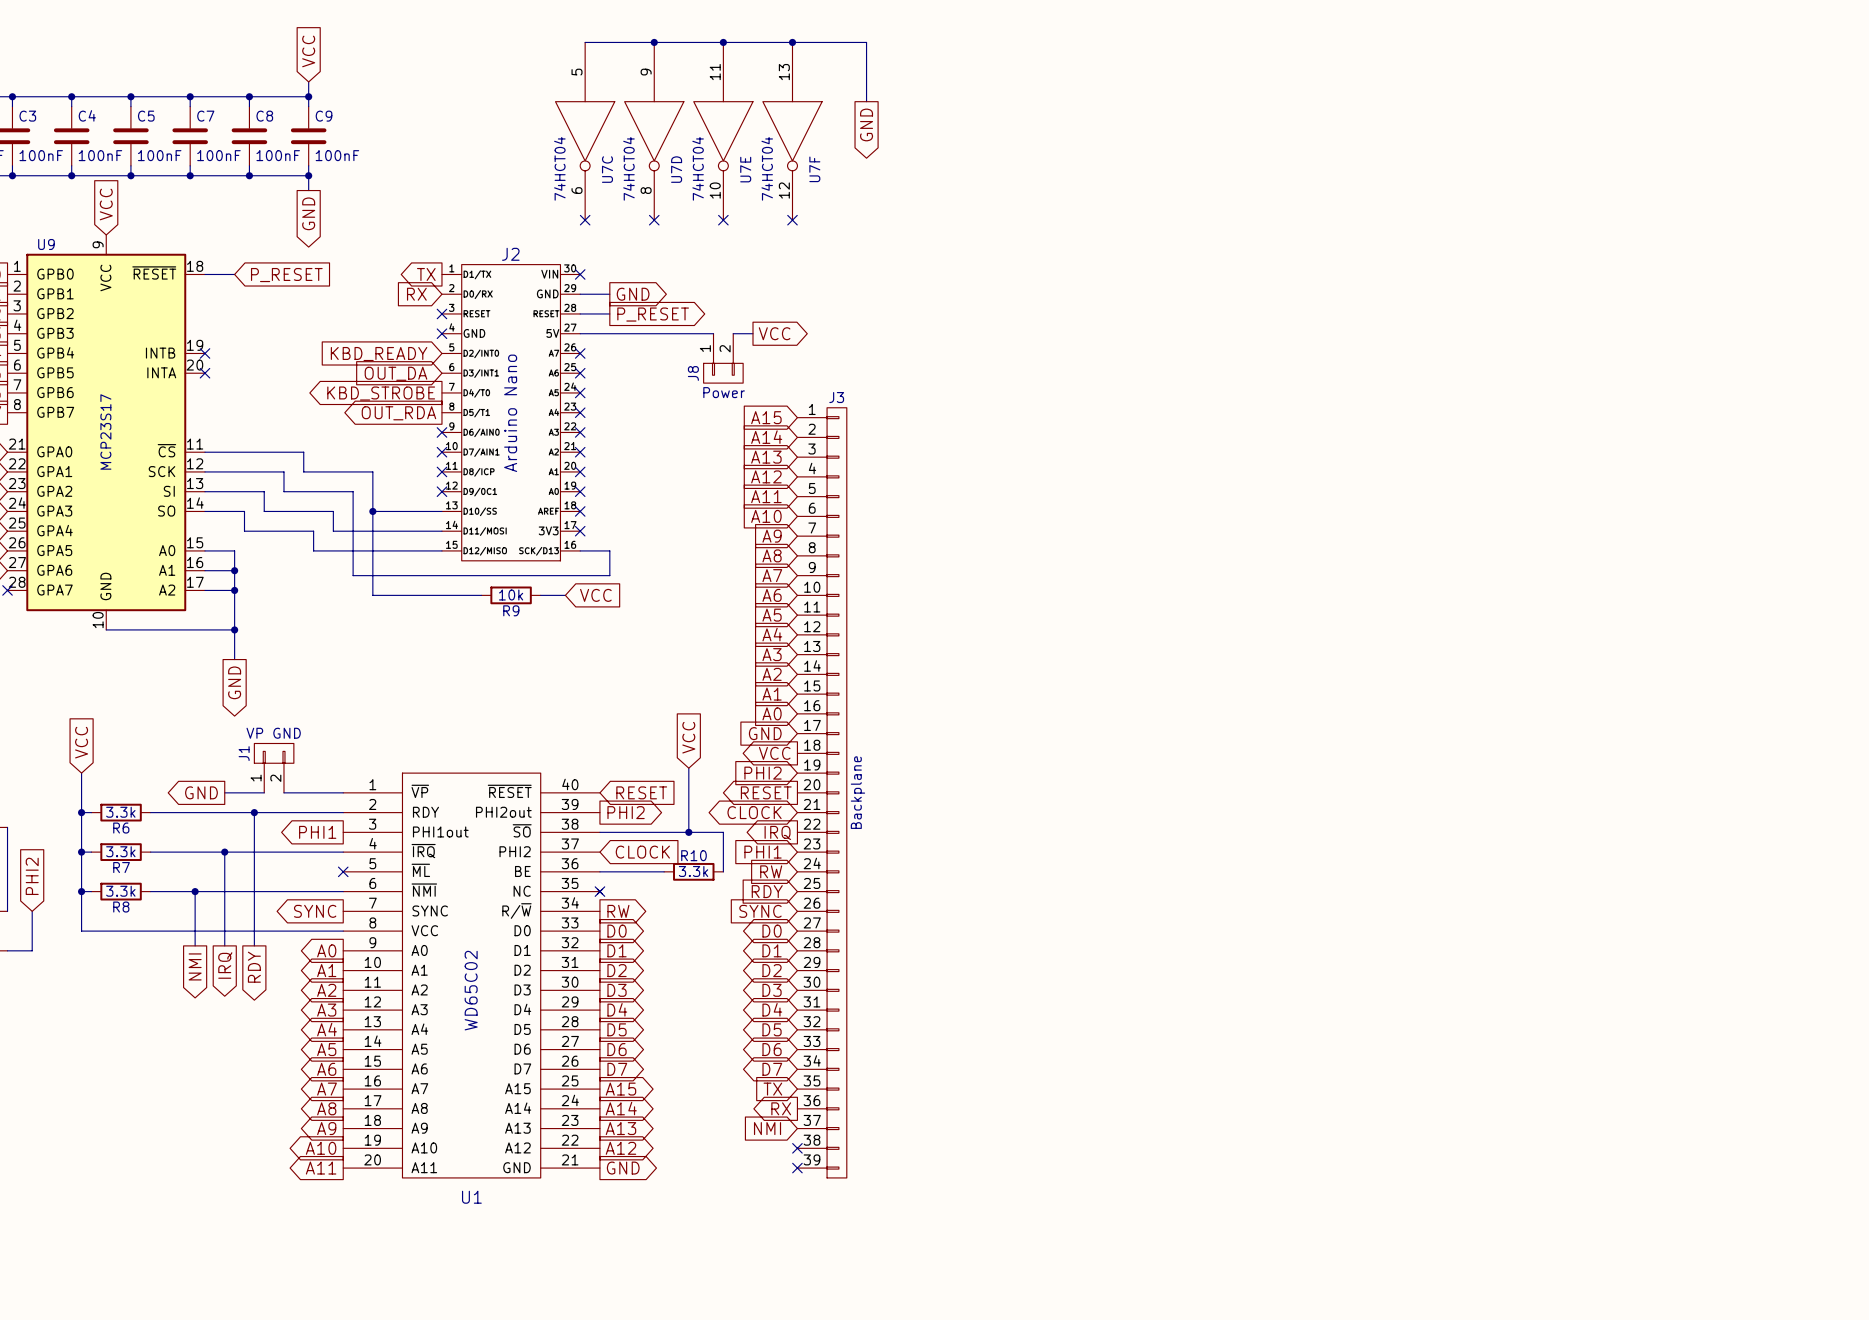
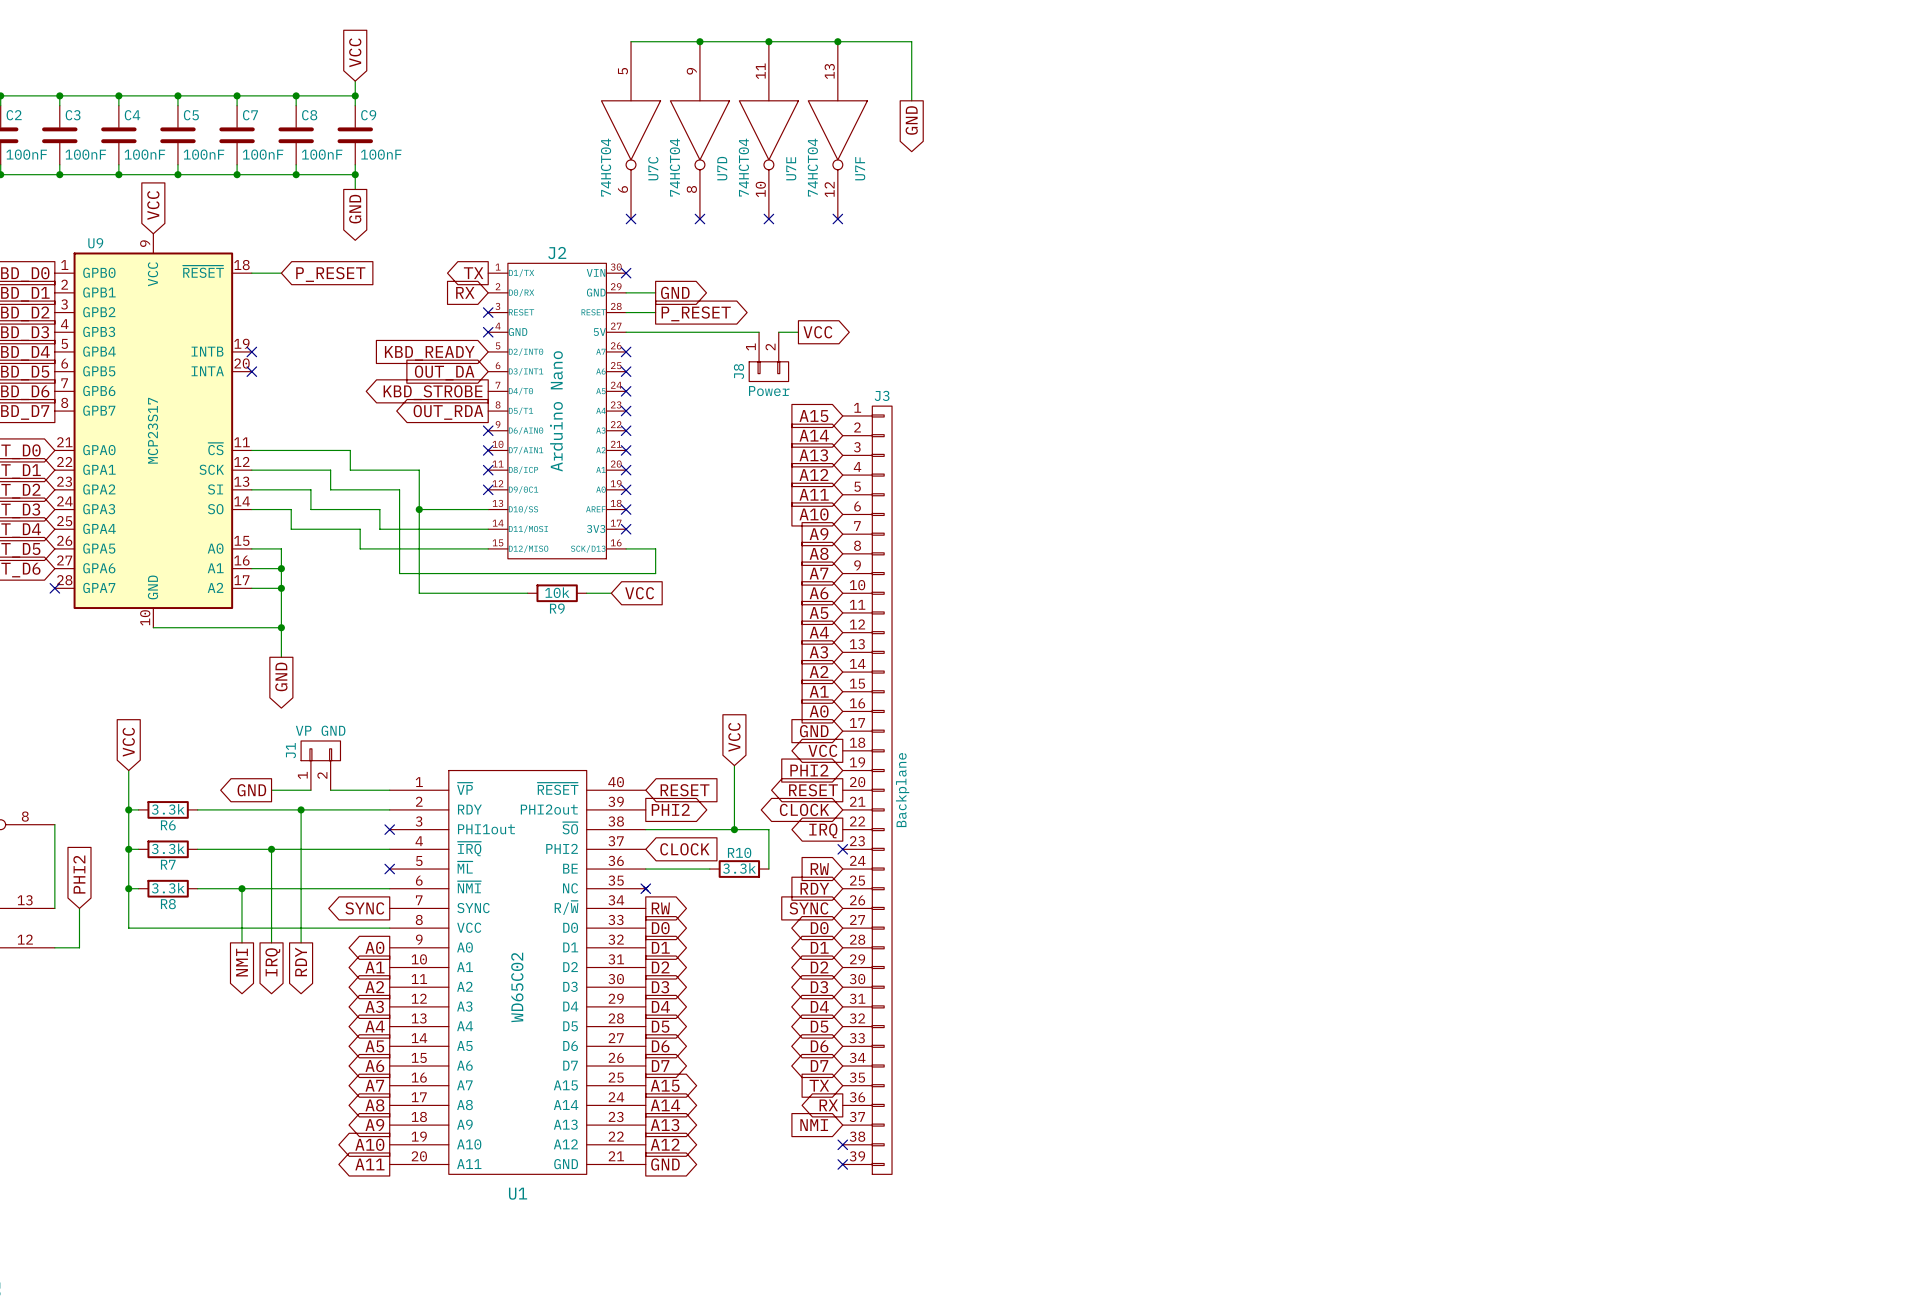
global label: PHI1 (317, 832) -> none
no-connect mark: none -> (389, 829)
global label: PHI1 (763, 852) -> none
no-connect mark: none -> (842, 849)

